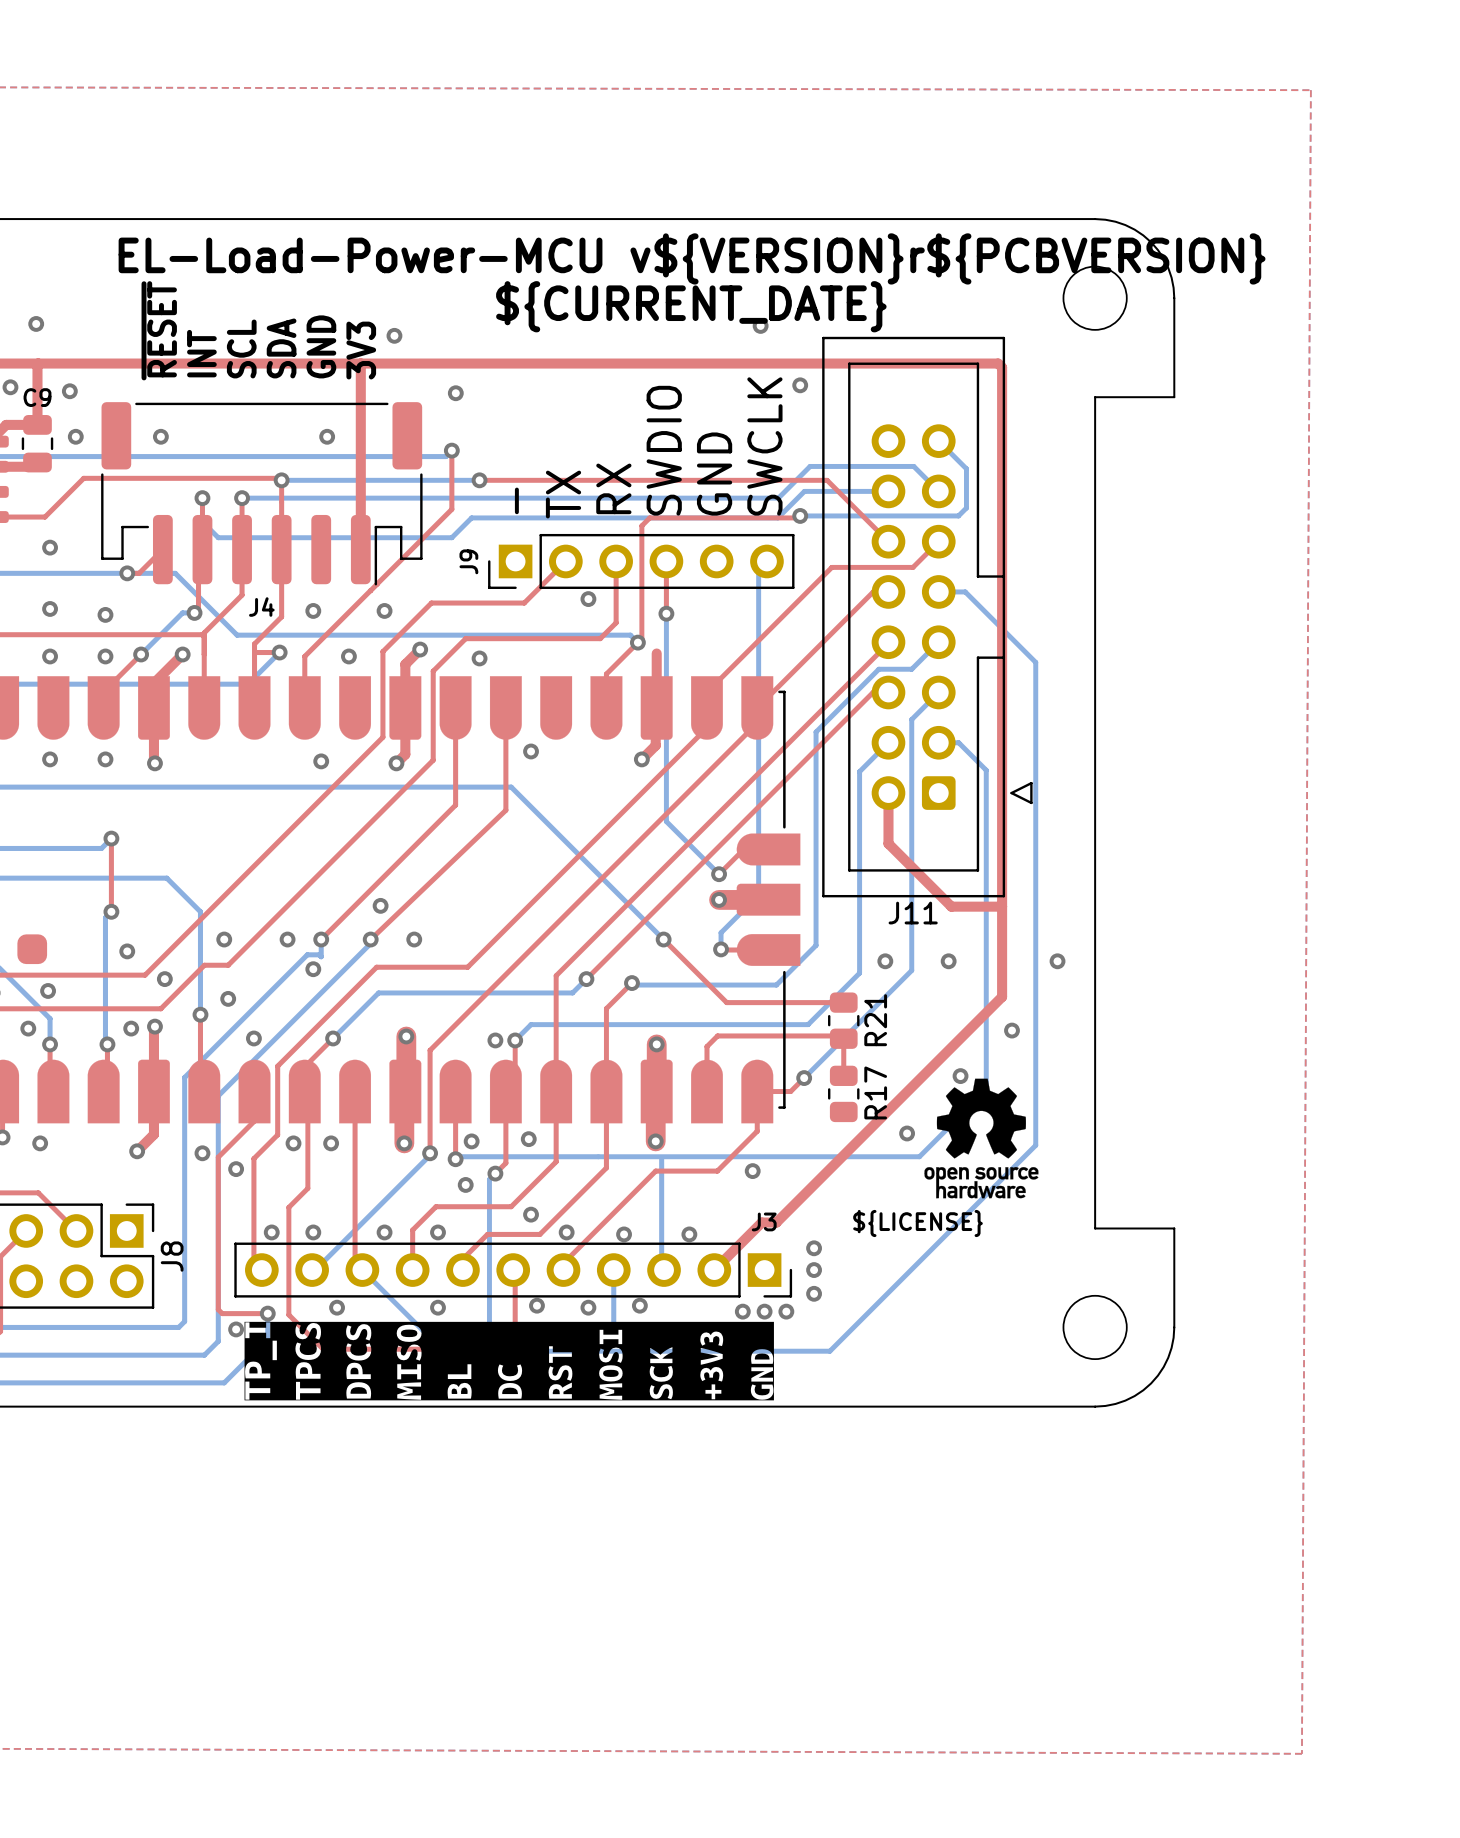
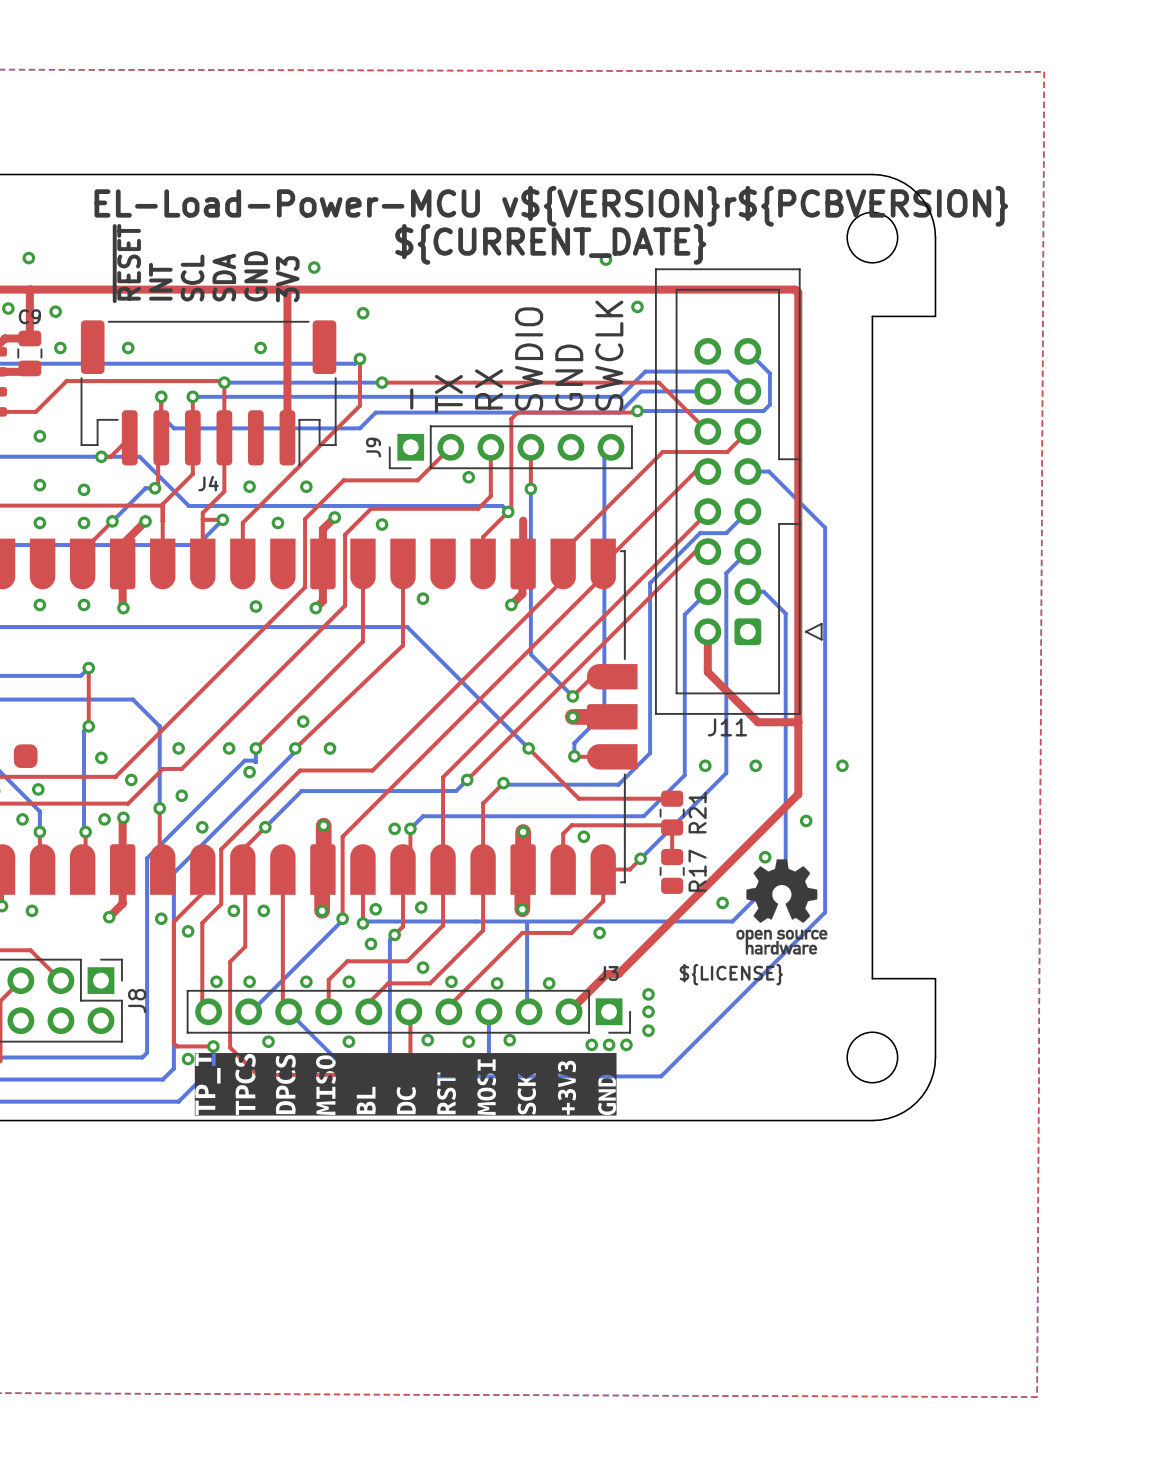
via: none -> (583, 836)

